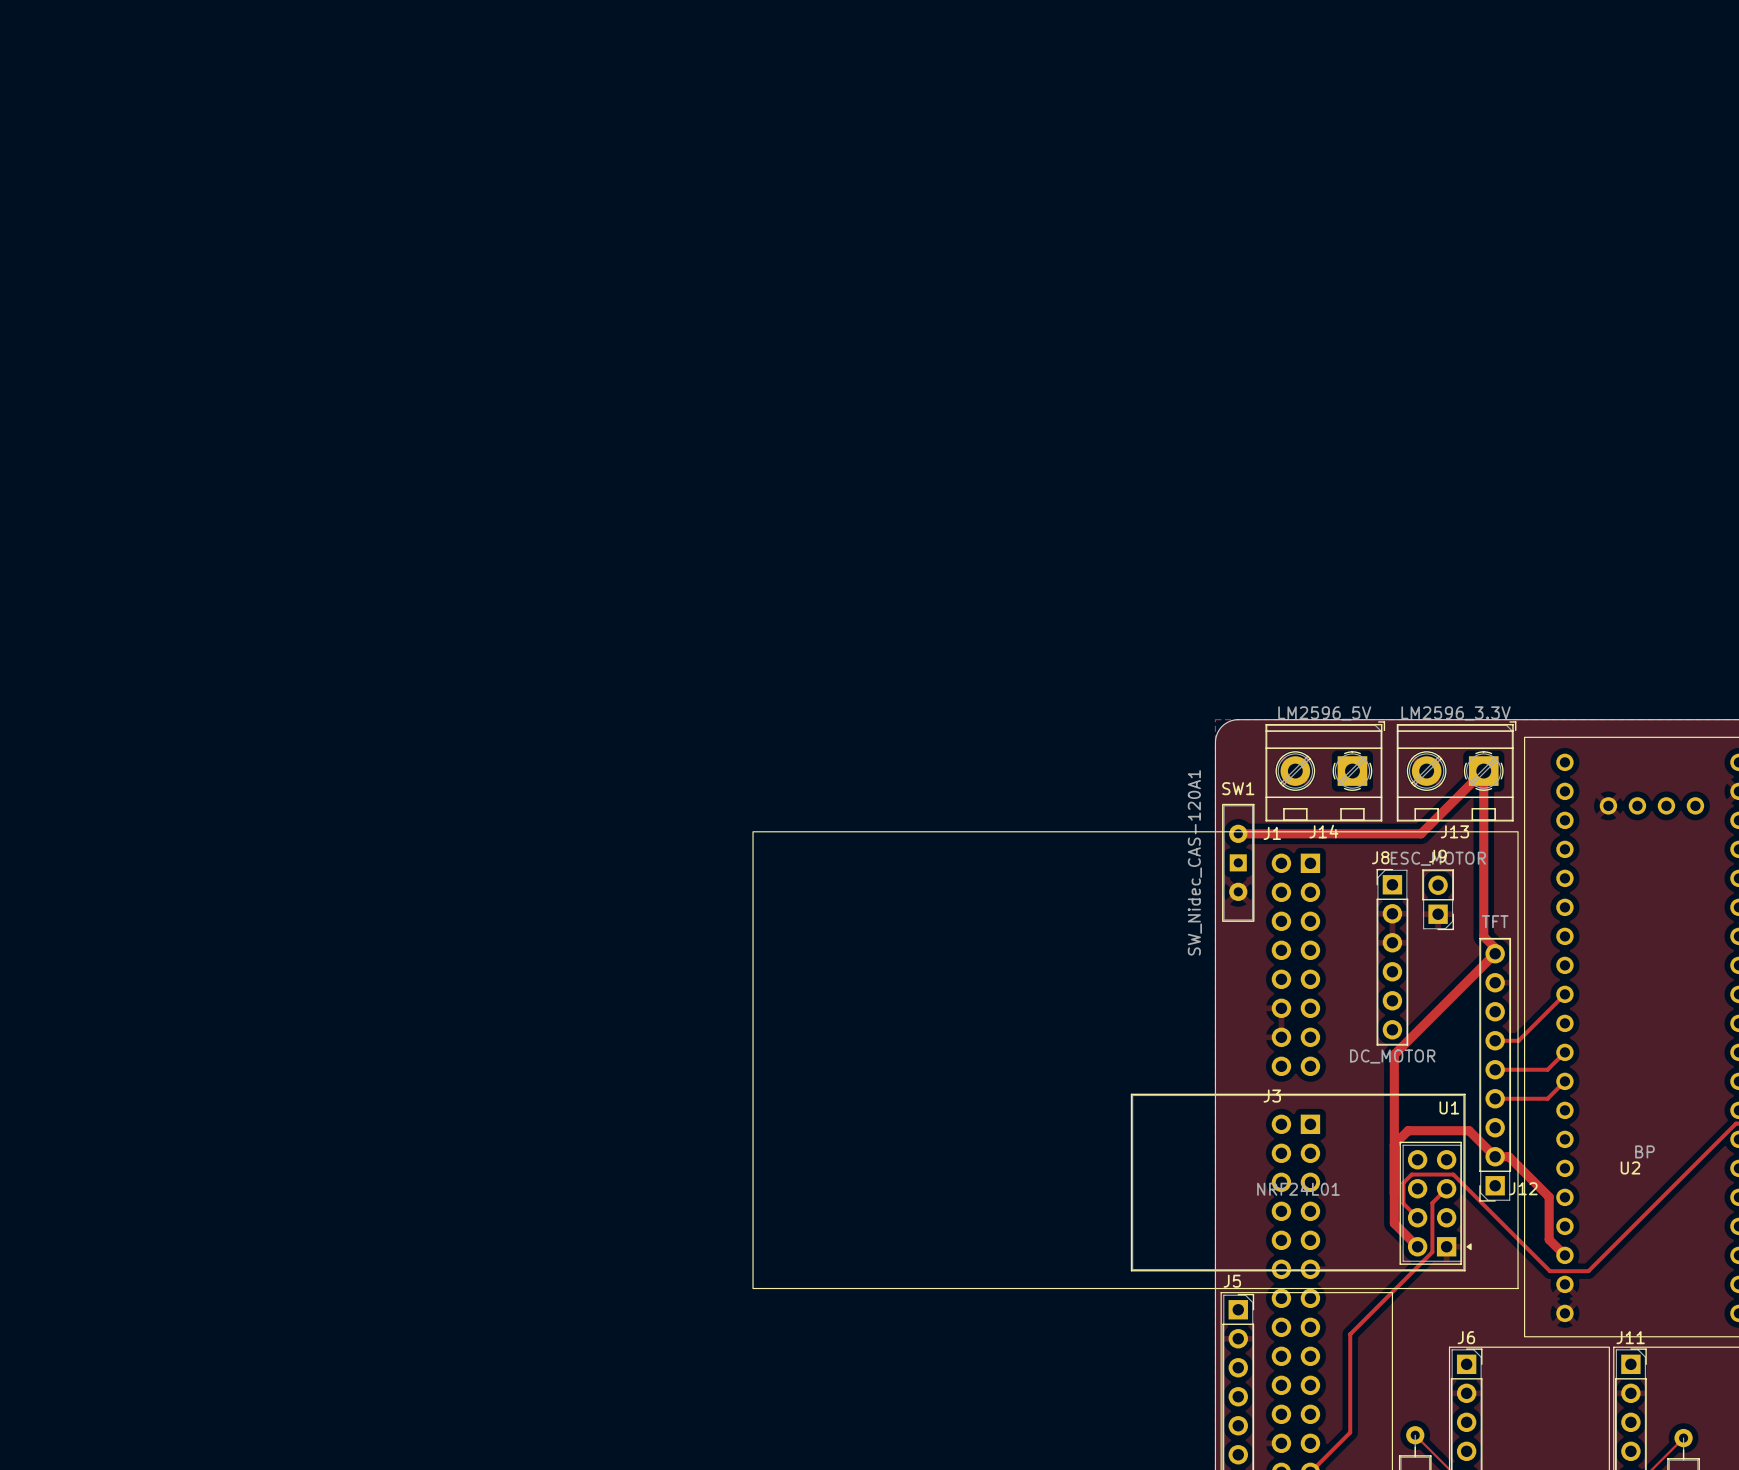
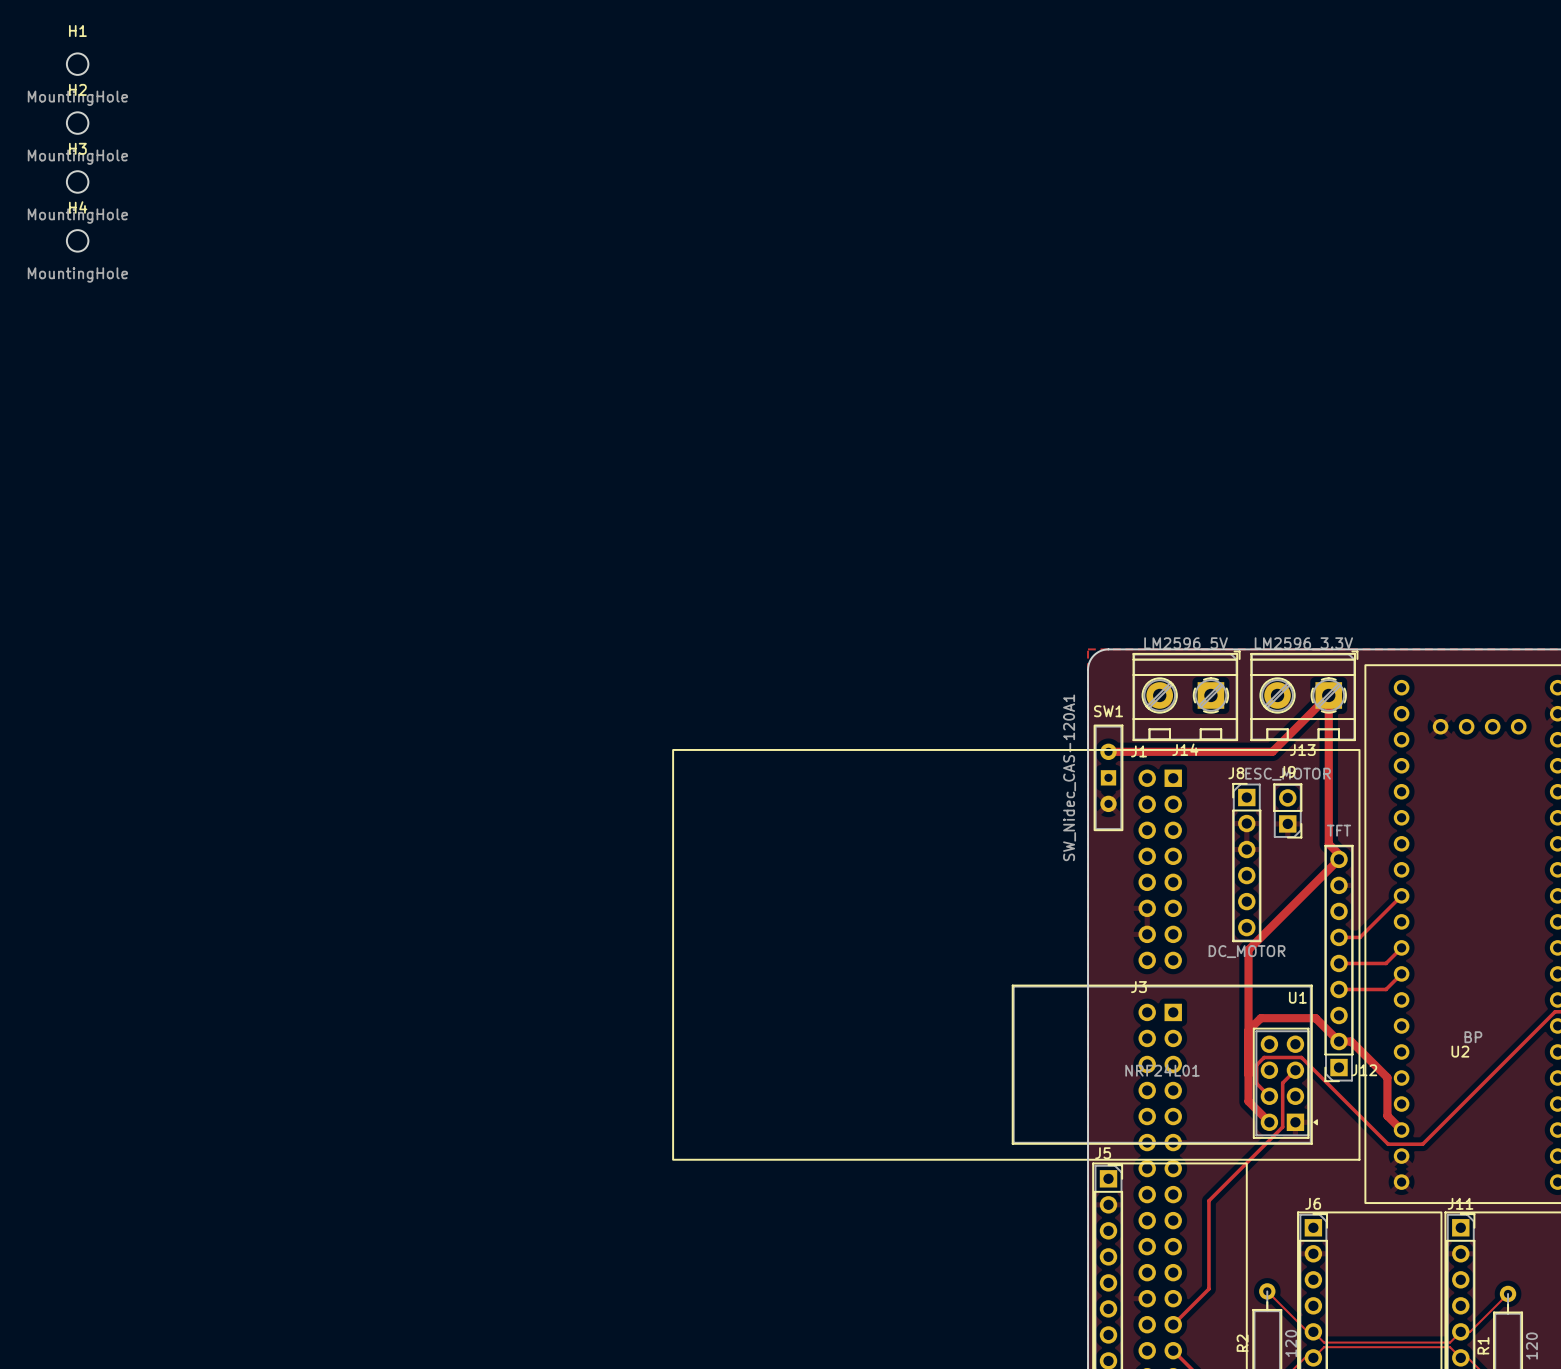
H1: none -> MountingHole (77, 64)
H2: none -> MountingHole (77, 123)
H3: none -> MountingHole (77, 181)
H4: none -> MountingHole (77, 240)

